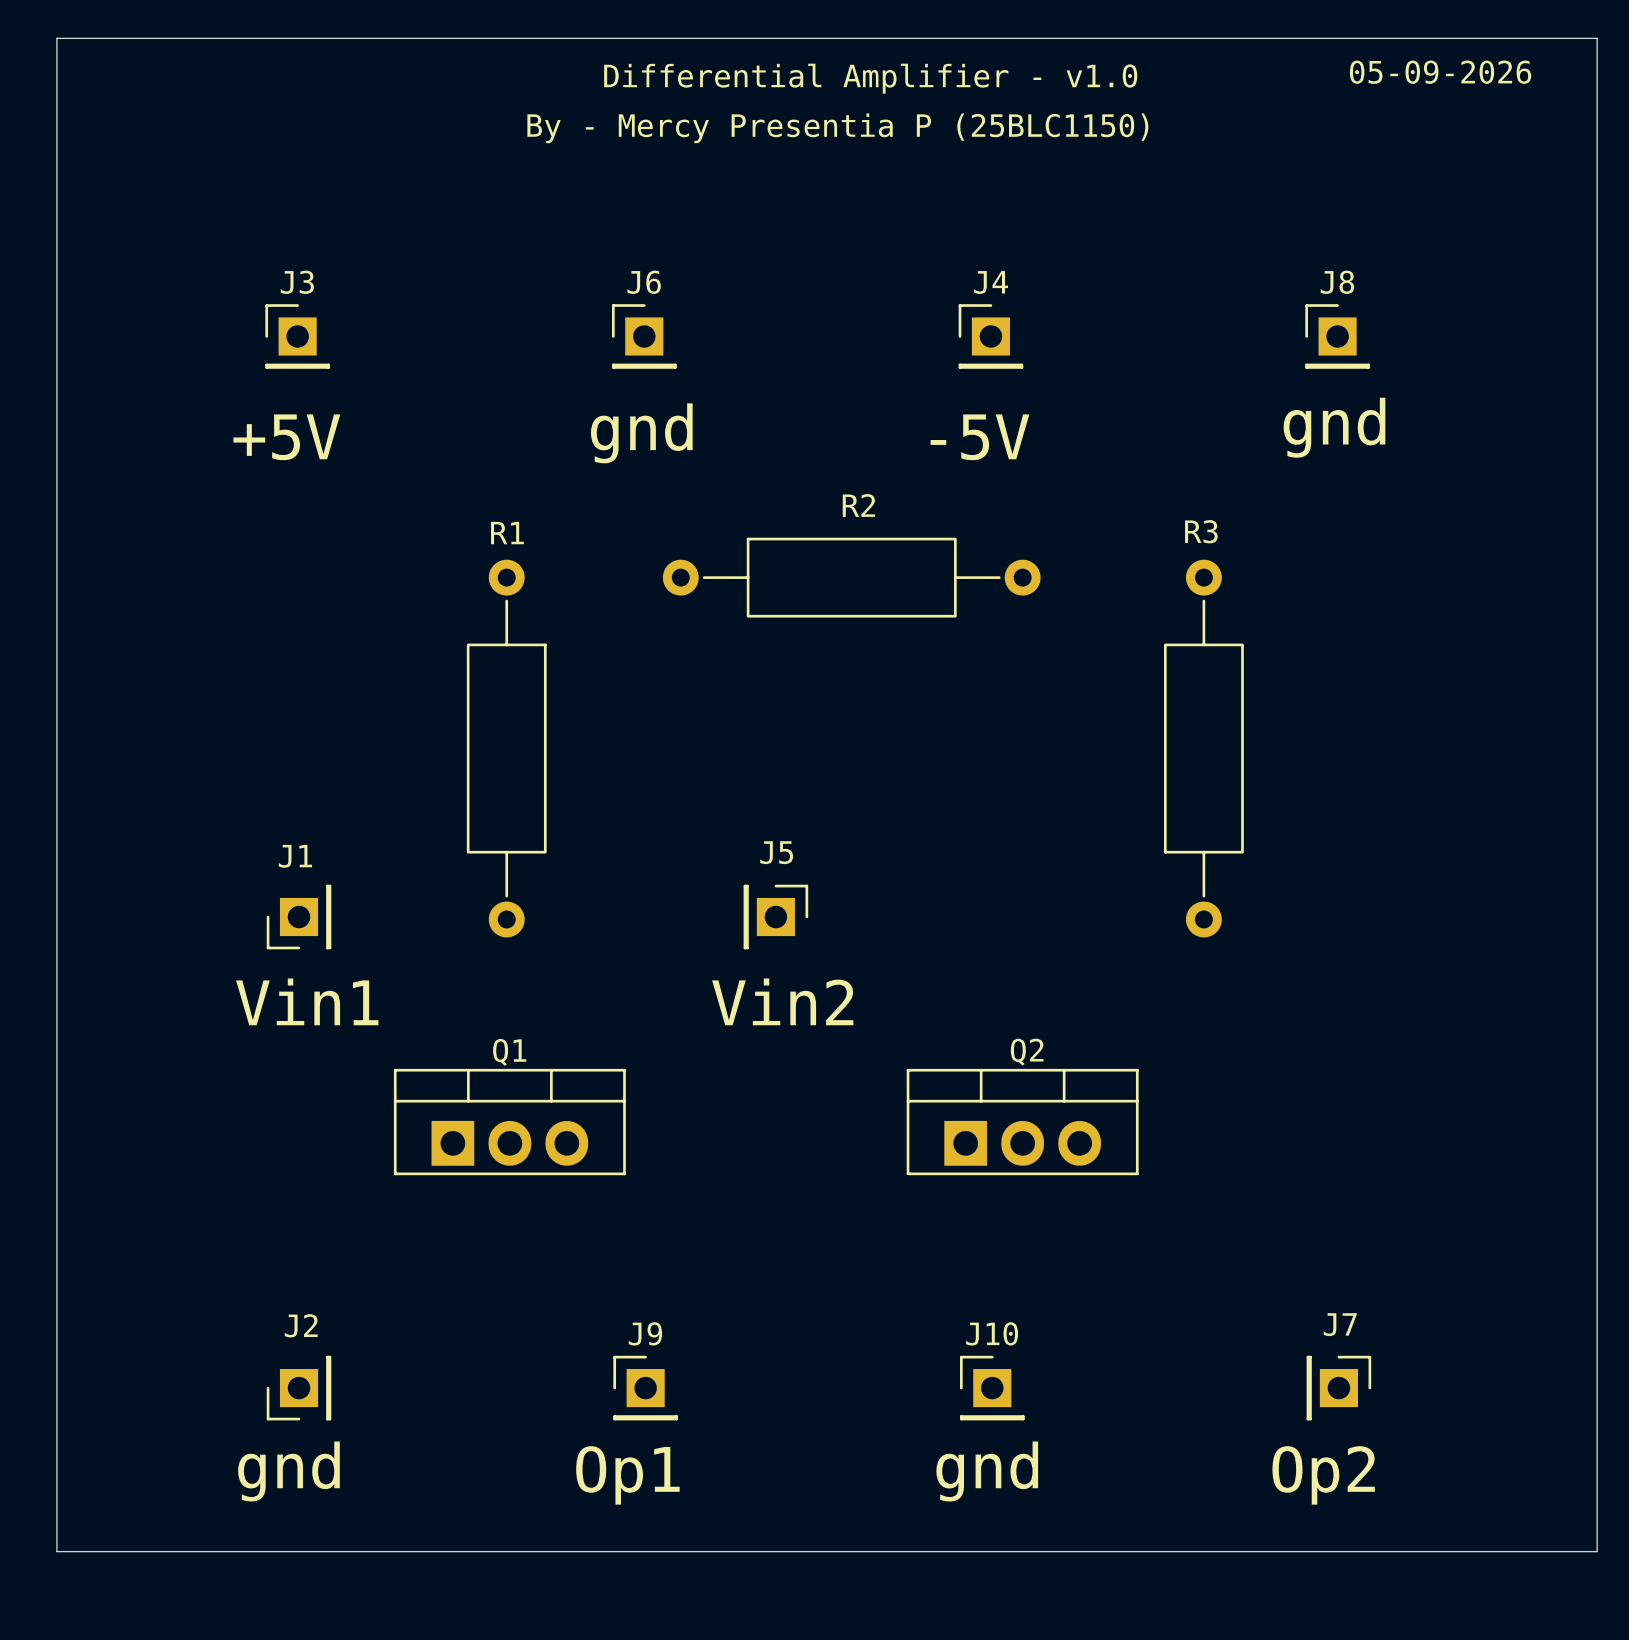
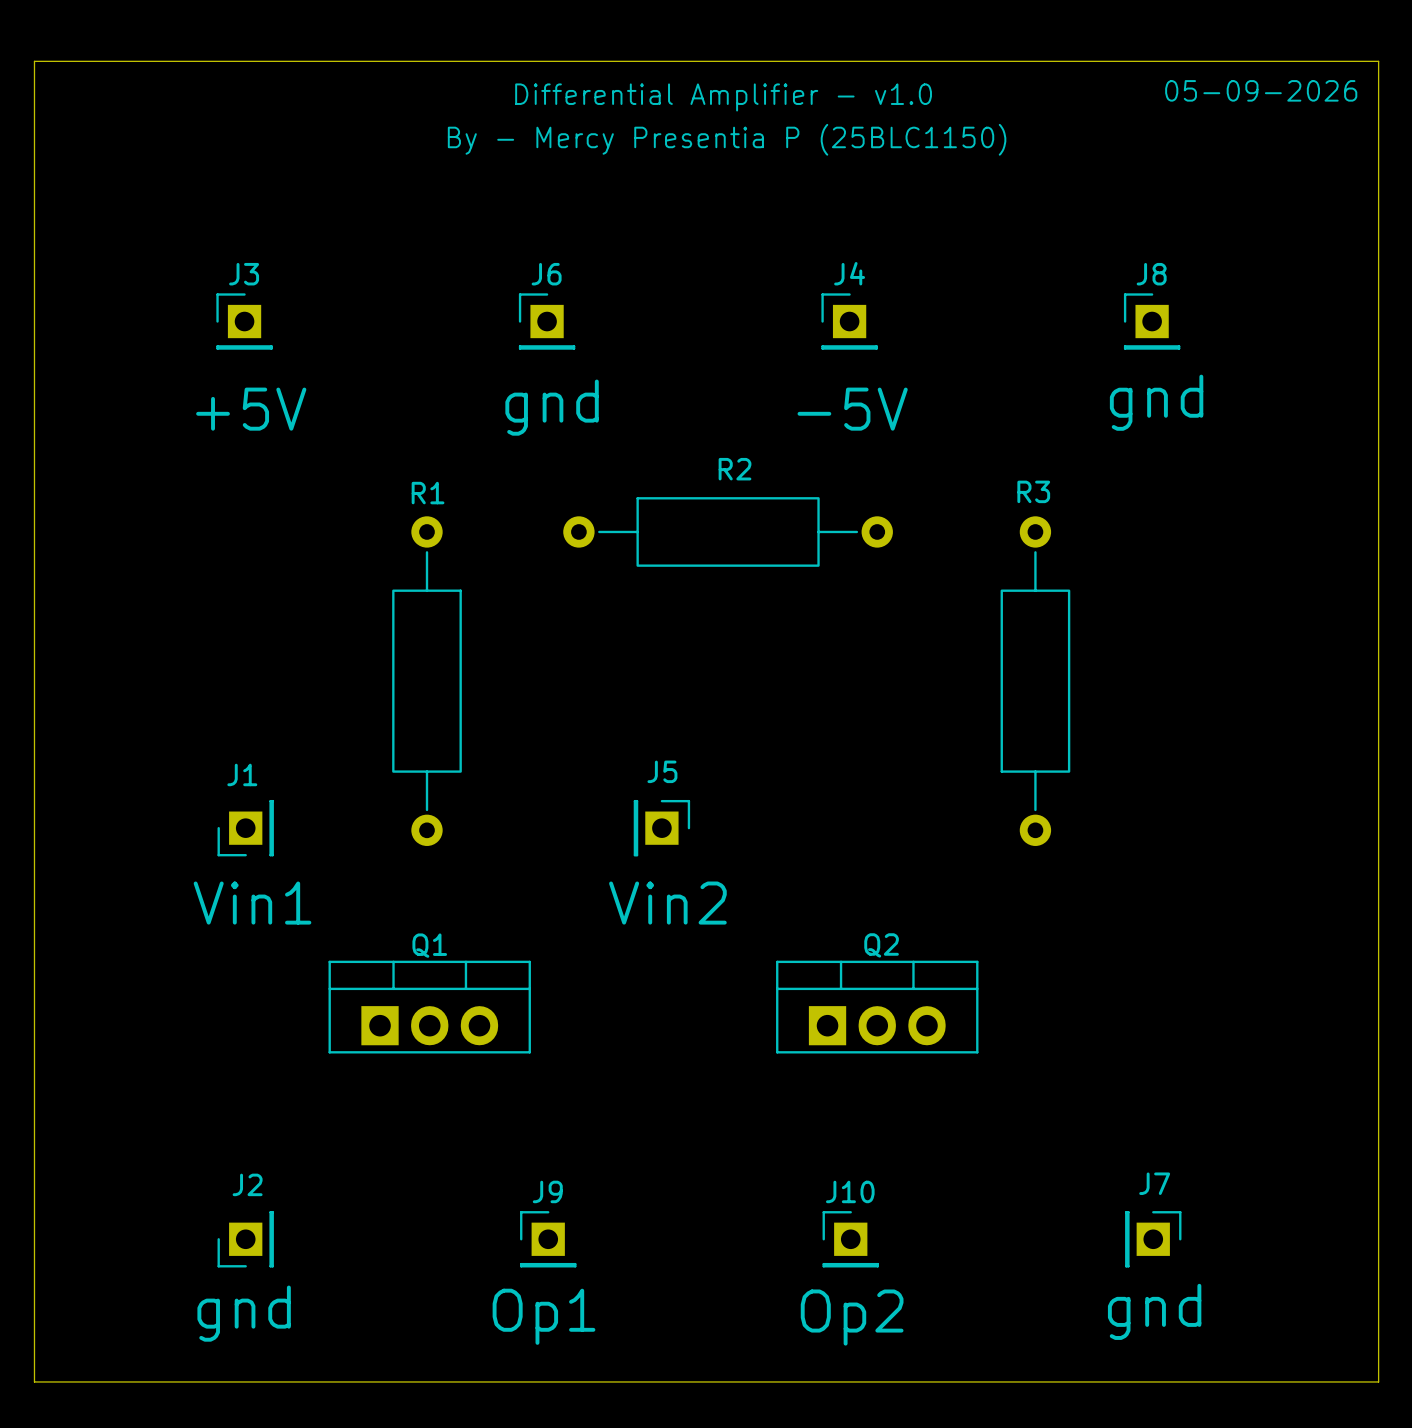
text: gnd (987, 1471) -> Op2 (852, 1317)
text: Op2 (1323, 1475) -> gnd (1154, 1311)

